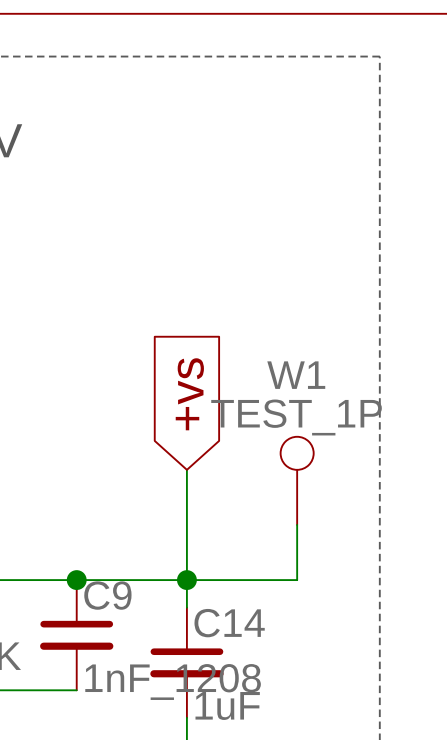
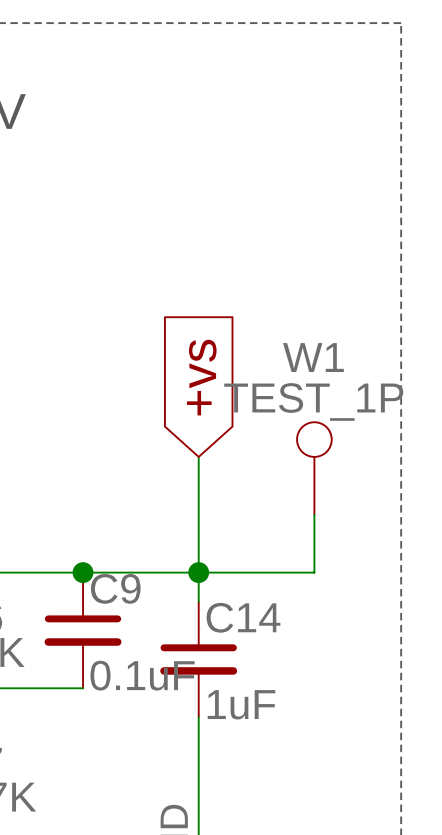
C9 value: 1nF_1208 (173, 682) -> 0.1uF (142, 675)

